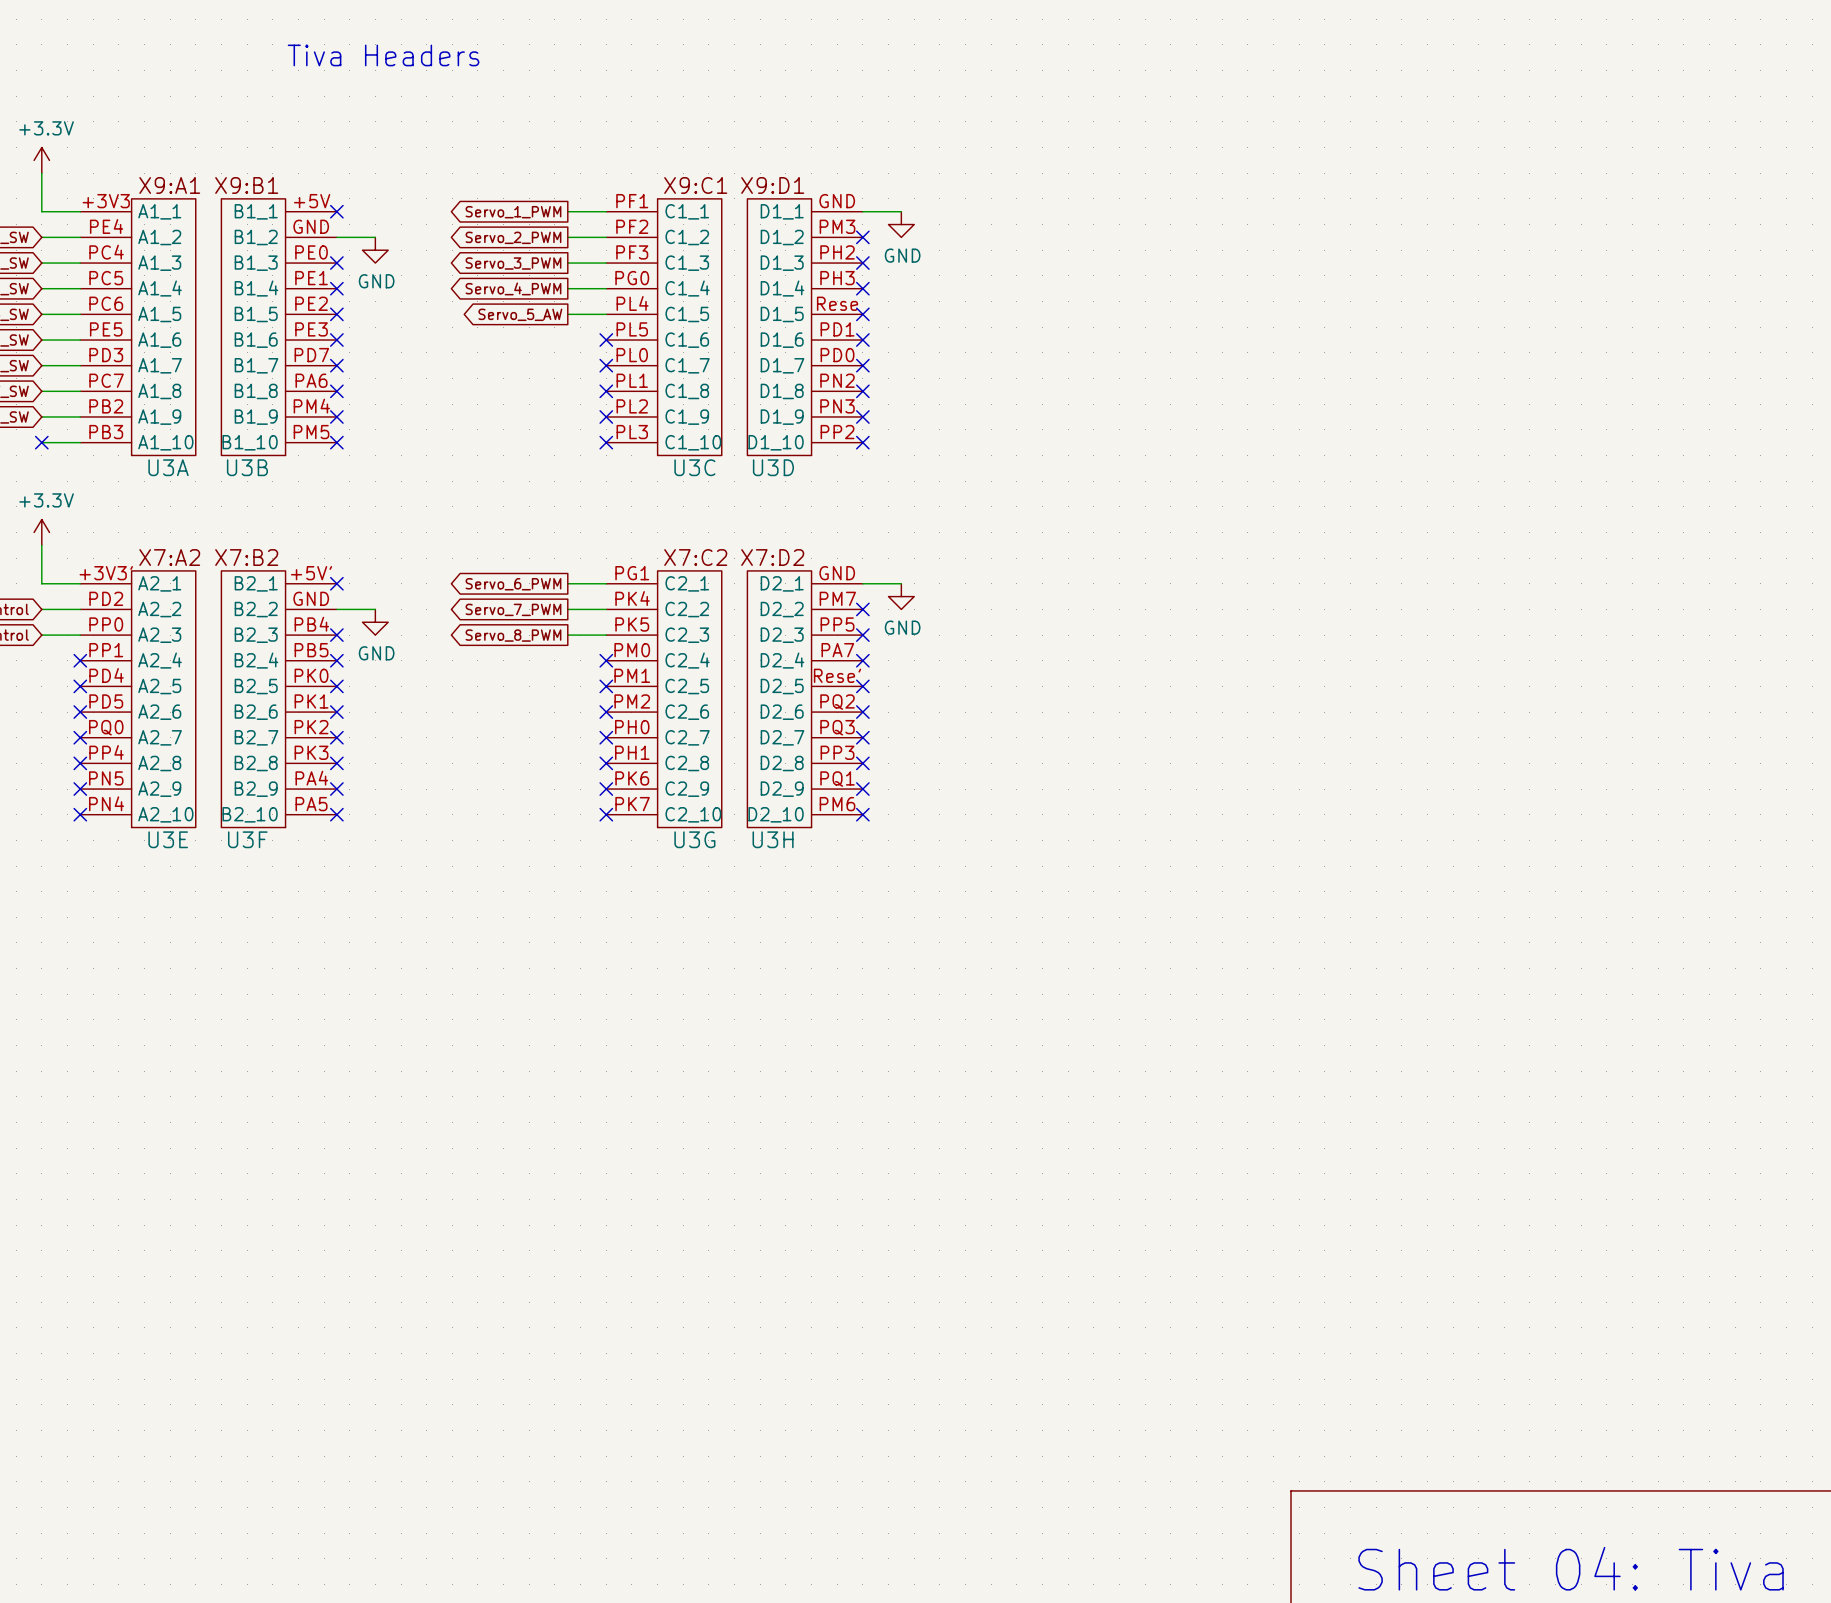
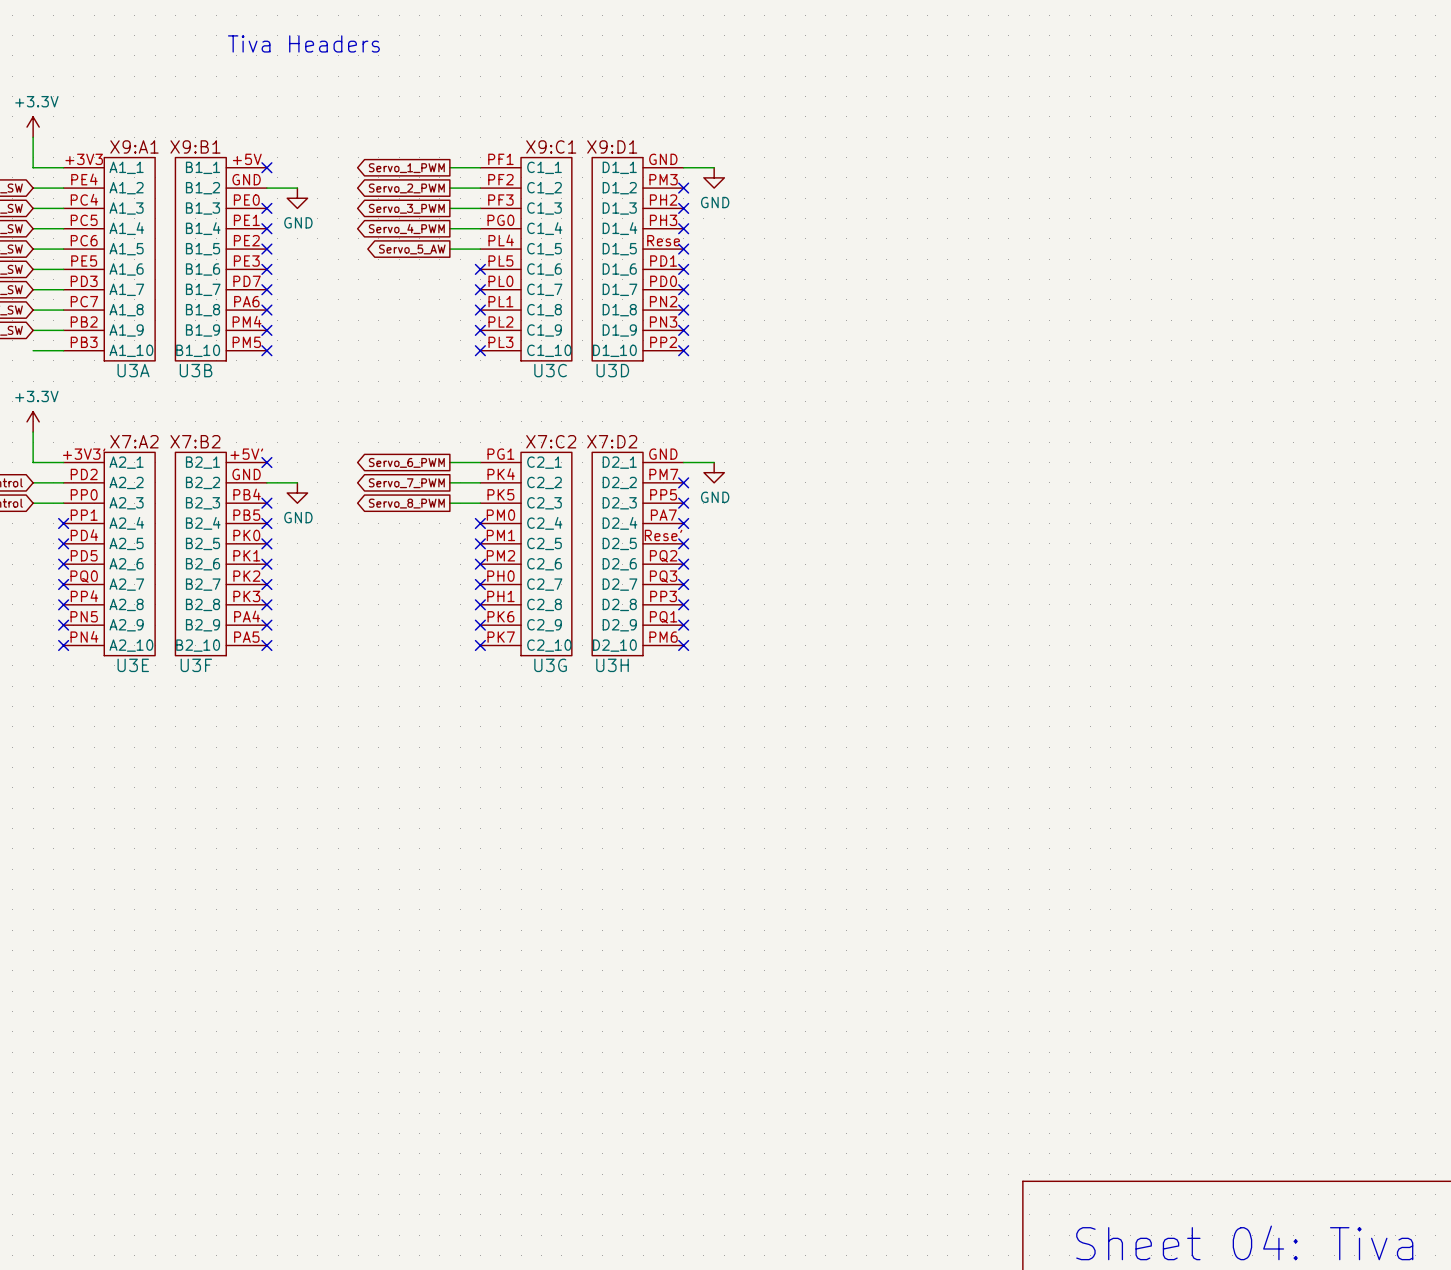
no-connect mark: (41, 442) -> none

